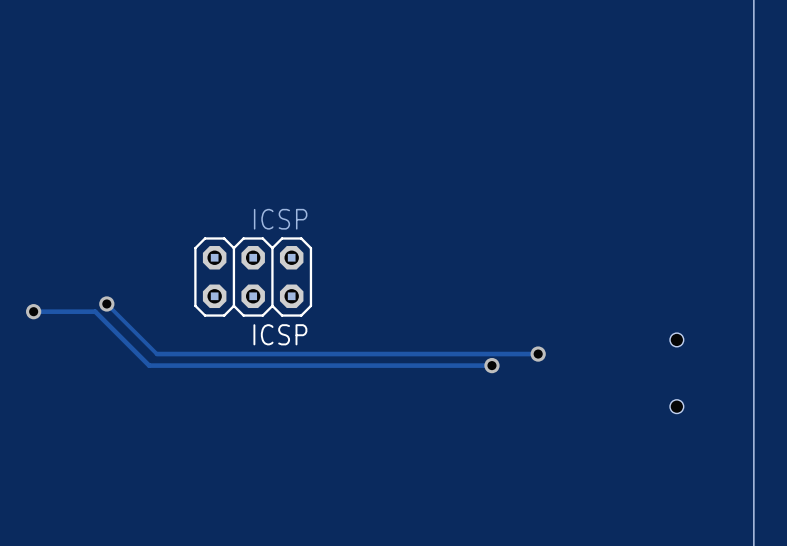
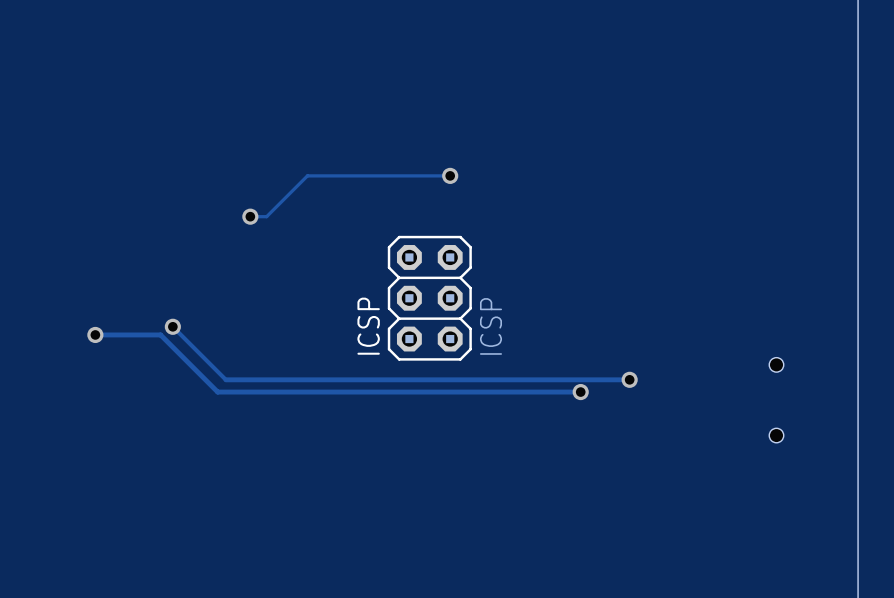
track: none -> (450, 175) (307, 175) (266, 216) (250, 216)
via: none -> (450, 175)
via: none -> (250, 216)
ICSP rotation: 0° (253, 277) -> 90° clockwise (429, 298)
ICSP position: (253, 277) -> (429, 298)

